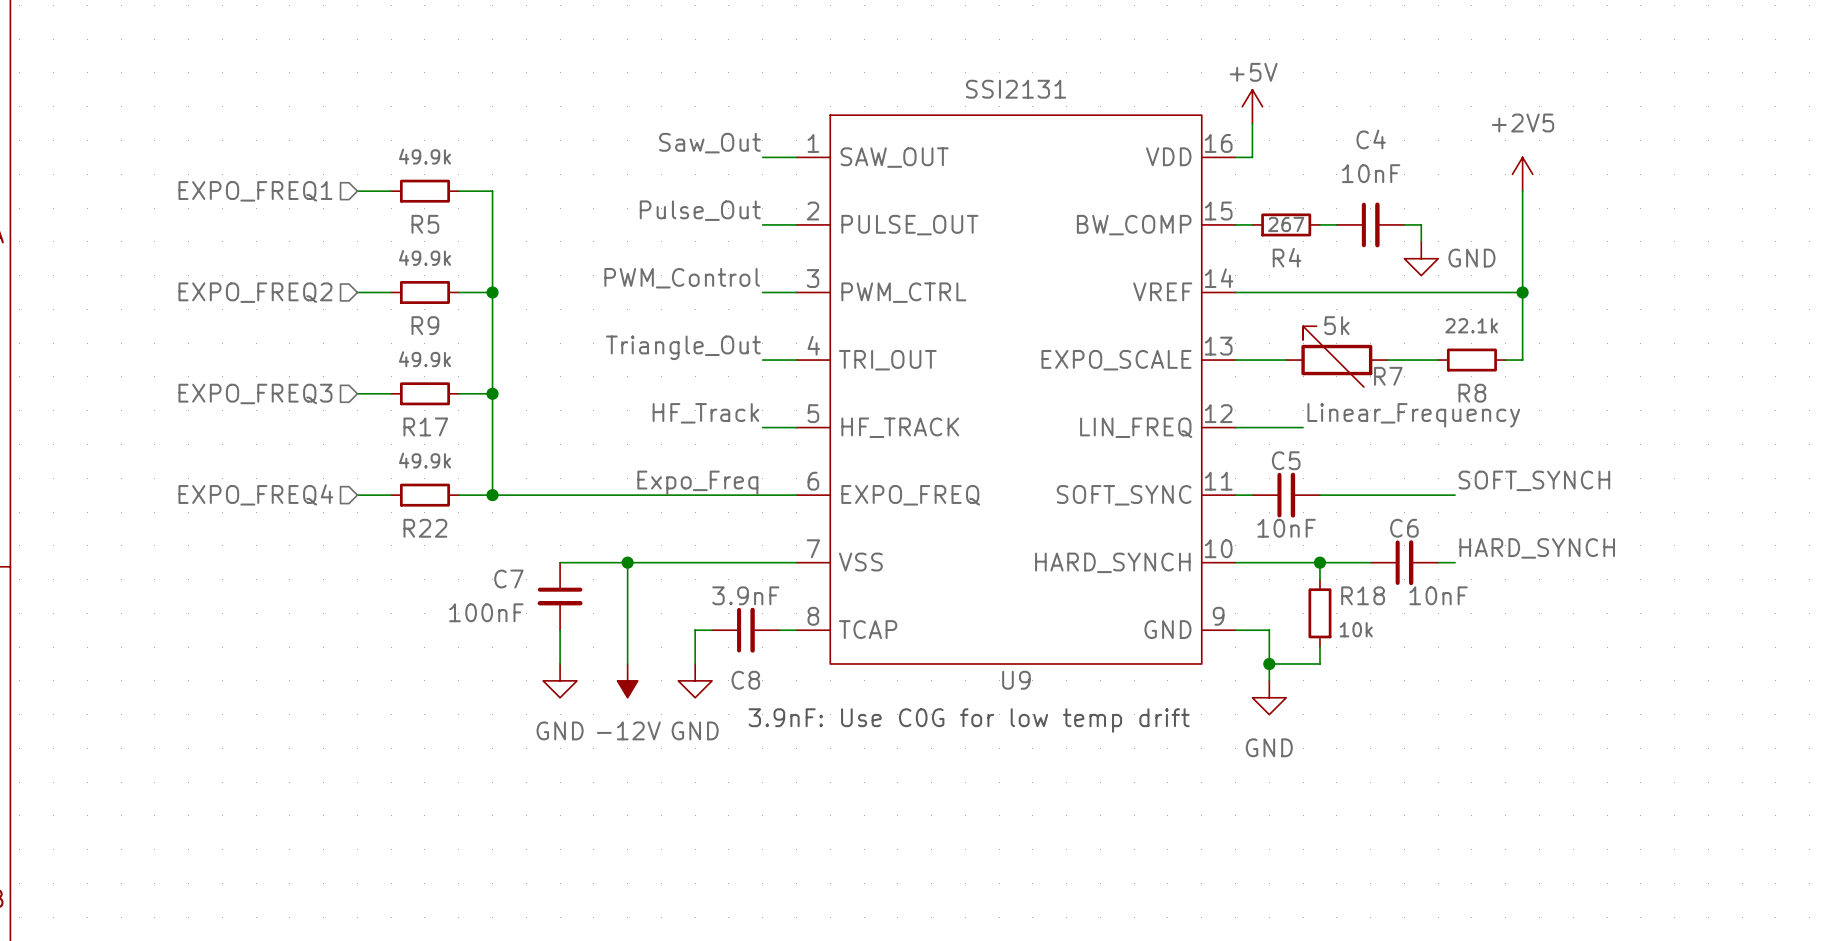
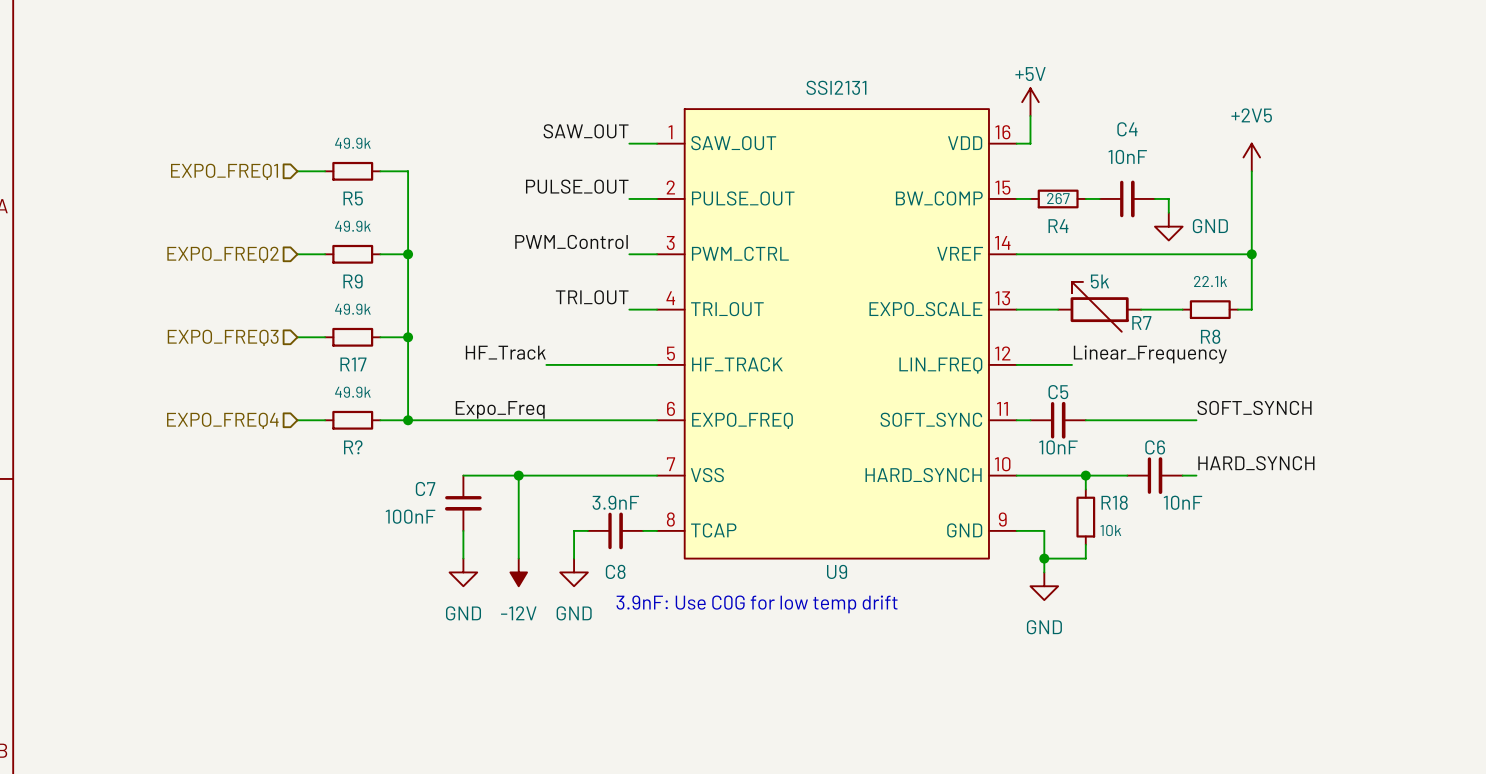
label: Saw_Out (709, 143) -> SAW_OUT (586, 131)
label: Pulse_Out (700, 210) -> PULSE_OUT (577, 186)
label: Triangle_Out (683, 347) -> TRI_OUT (592, 297)
label position: HF_Track (705, 413) -> HF_Track (505, 352)
wire: none -> (546, 364) (629, 364)
label position: Expo_Freq (697, 482) -> Expo_Freq (500, 409)
R22 name: R22 (425, 528) -> R? (353, 447)

